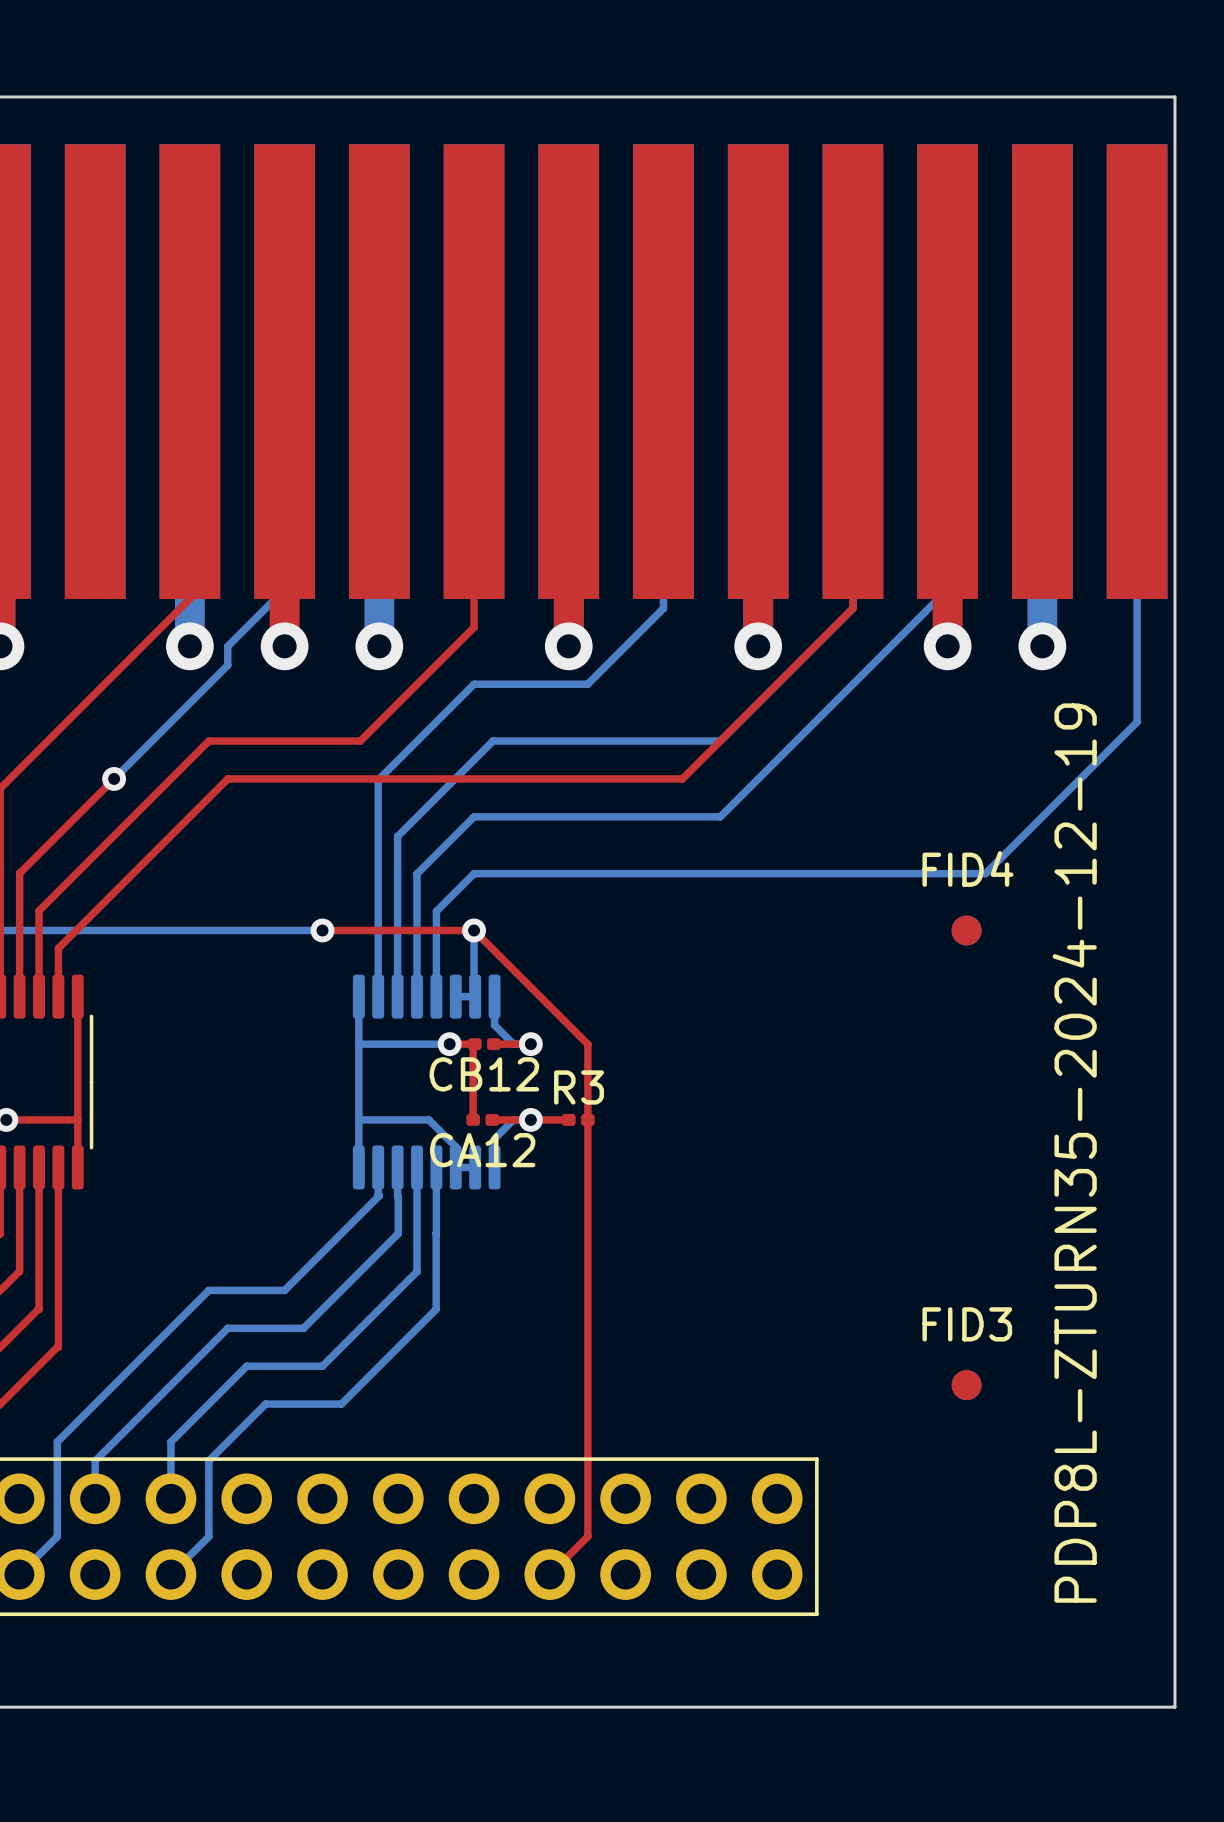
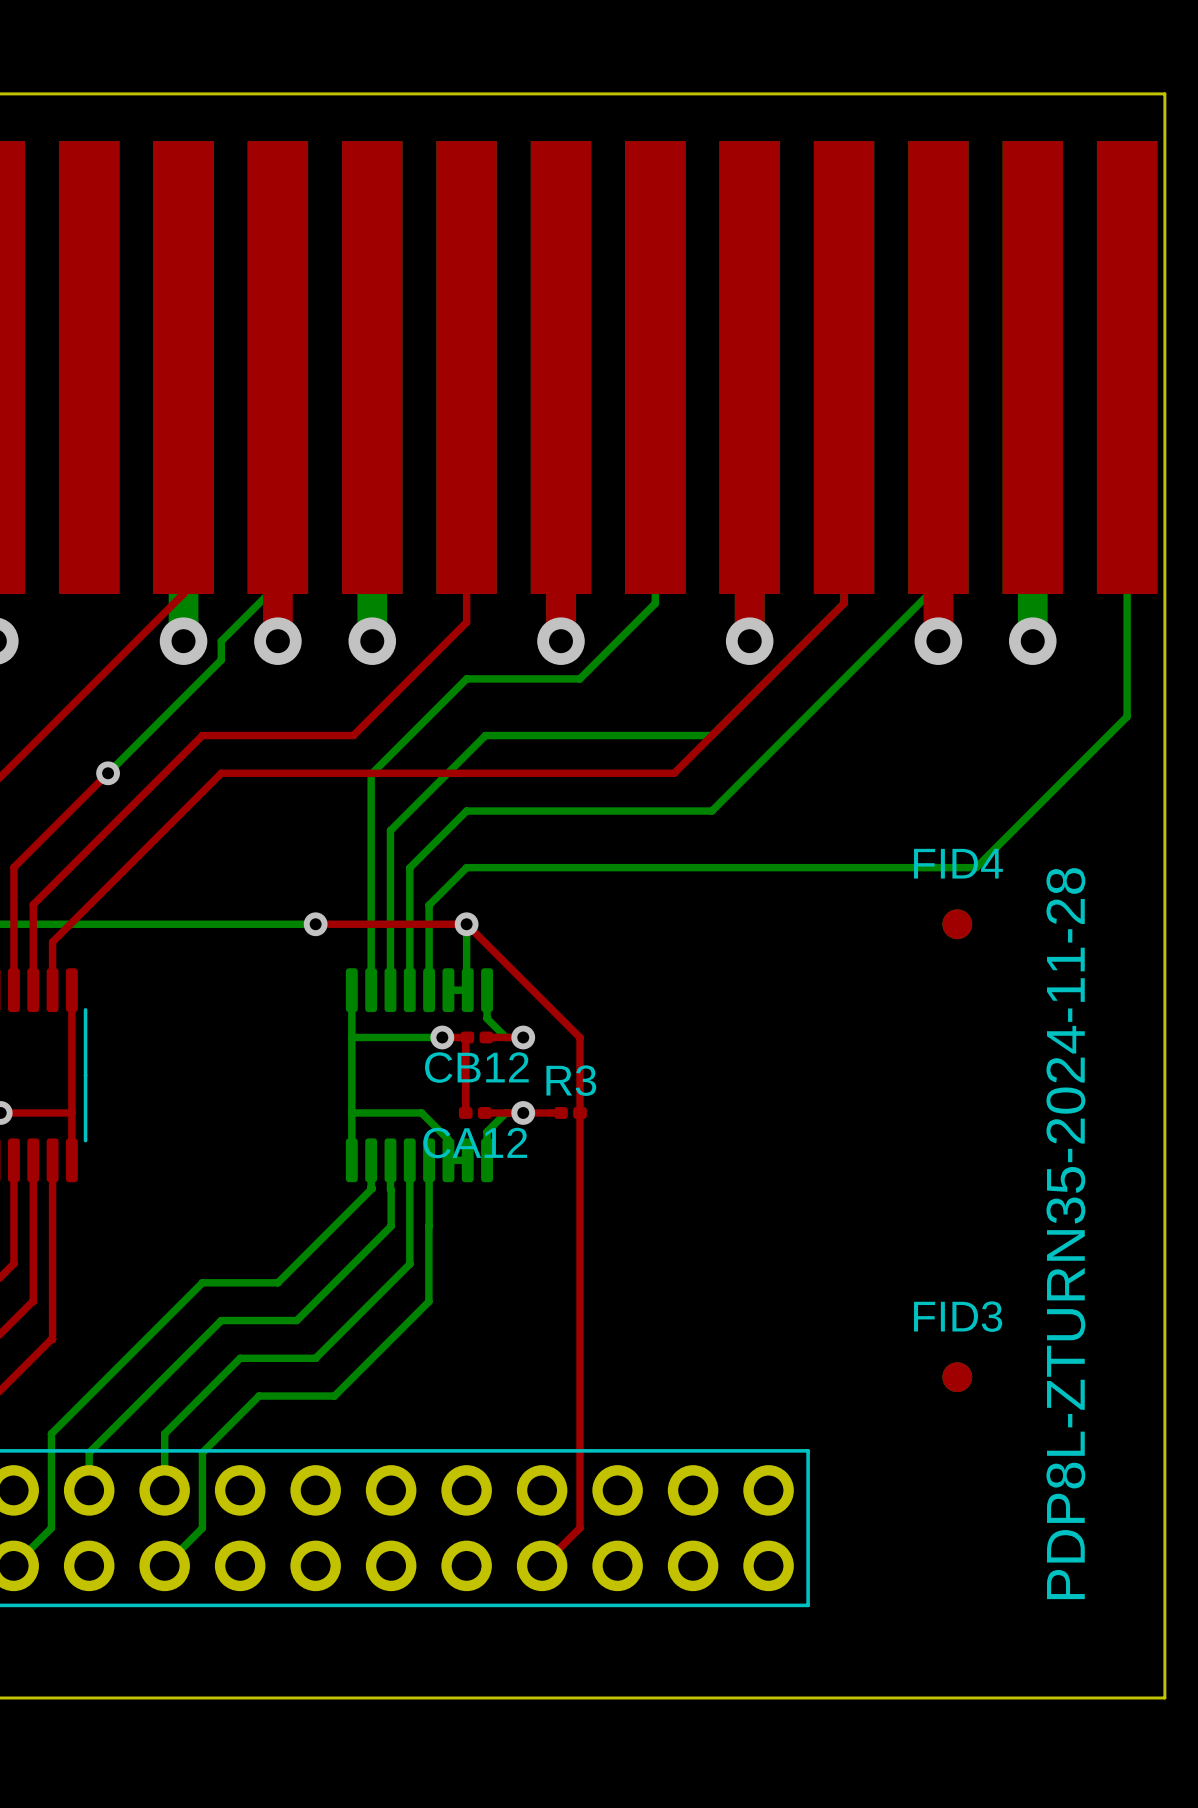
text: PDP8L-ZTURN35-2024-12-19 (1074, 1153) -> PDP8L-ZTURN35-2024-11-28 (1065, 1233)

